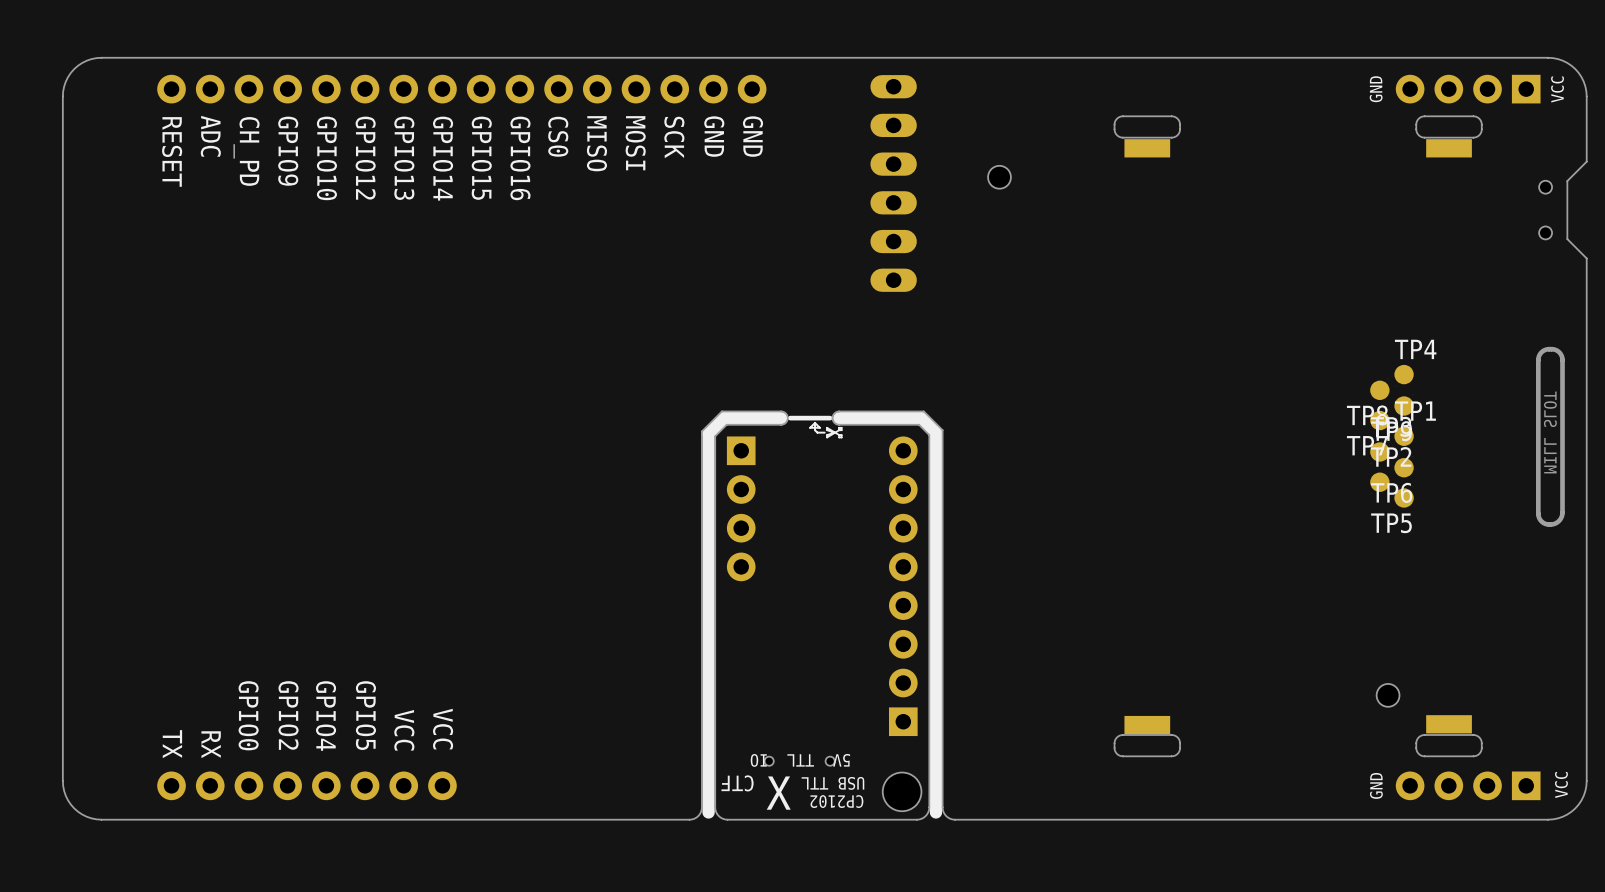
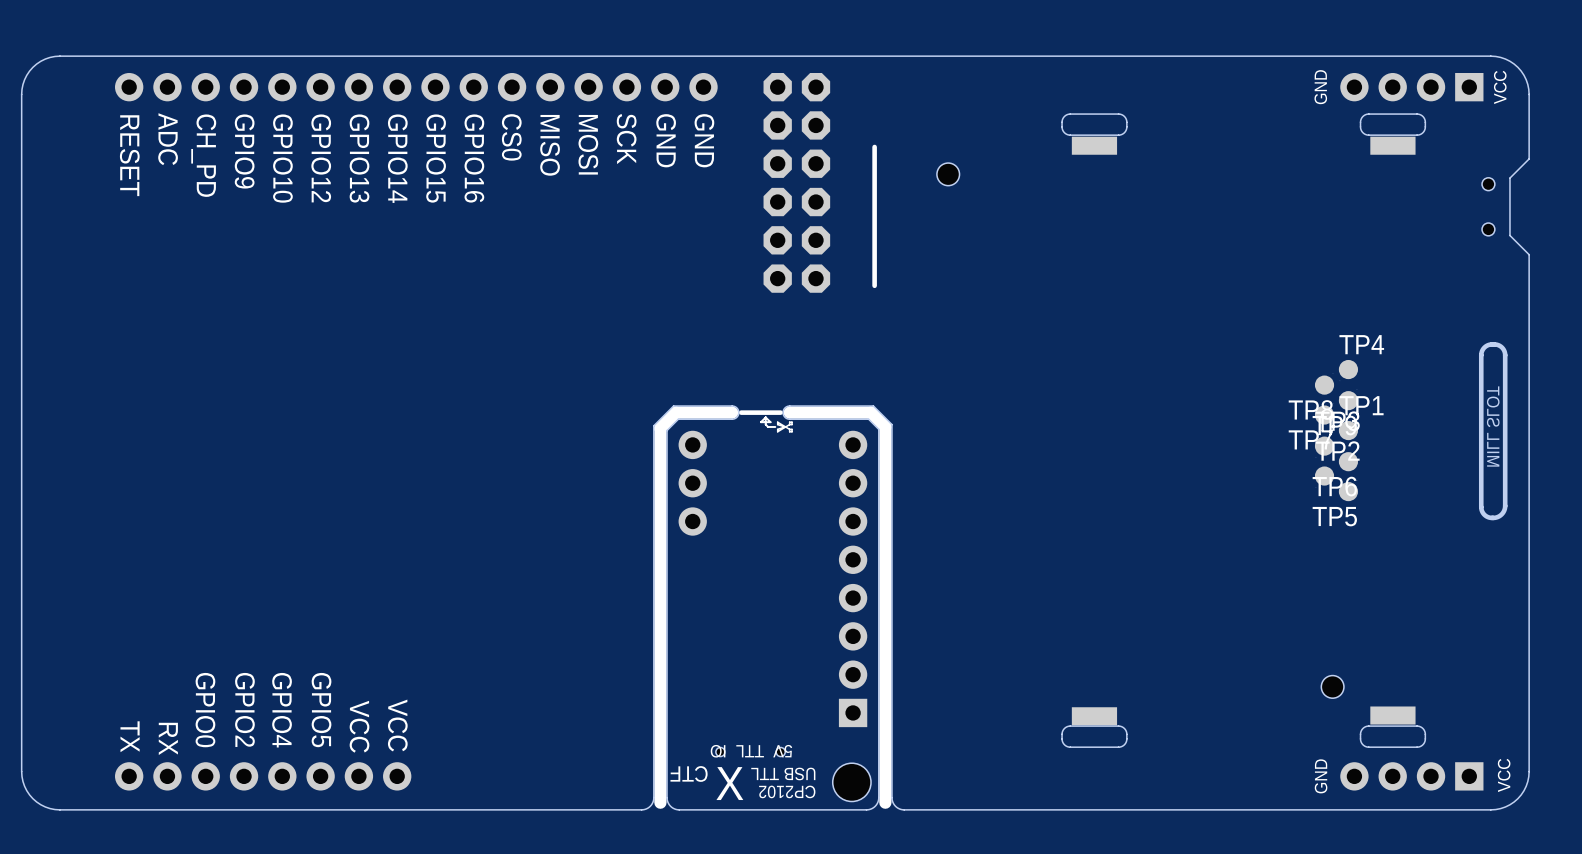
line: none -> (874, 146) (874, 285)
part: (893, 183) -> none
part: none -> (796, 182)
part: none -> (692, 483)
part: (741, 508) -> none

